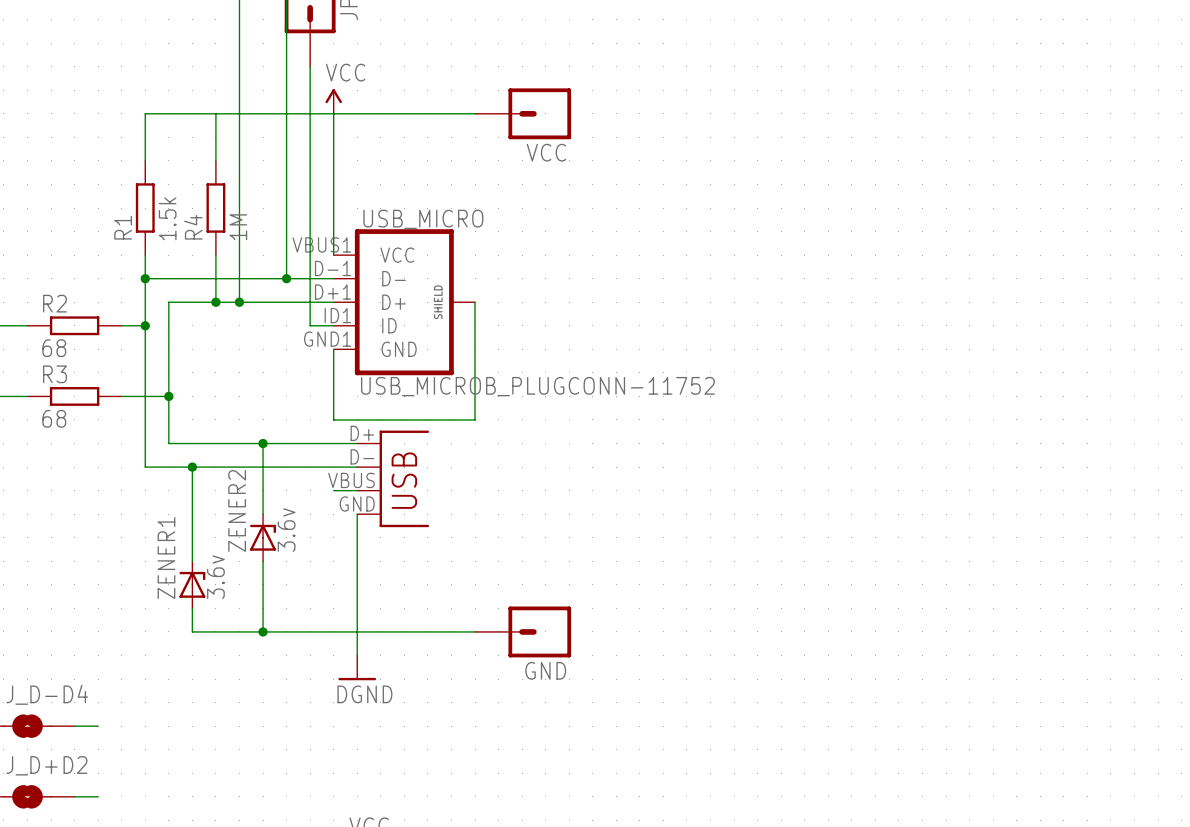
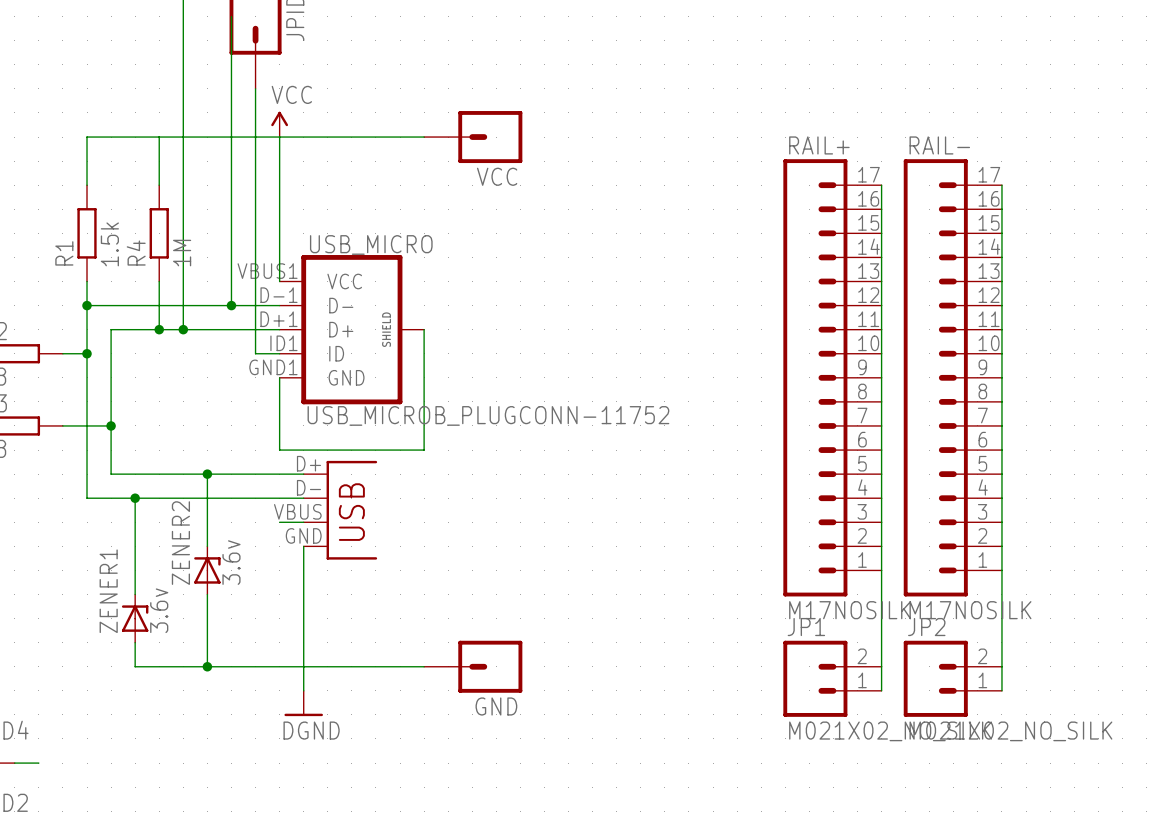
wire: none -> (881, 185) (881, 690)
wire: none -> (1001, 185) (1001, 690)
RAIL+: none -> M17NOSILK (832, 377)
RAIL-: none -> M17NOSILK (952, 377)
JP1: none -> M021X02_NO_SILK (832, 678)
JP2: none -> M021X02_NO_SILK (952, 678)

